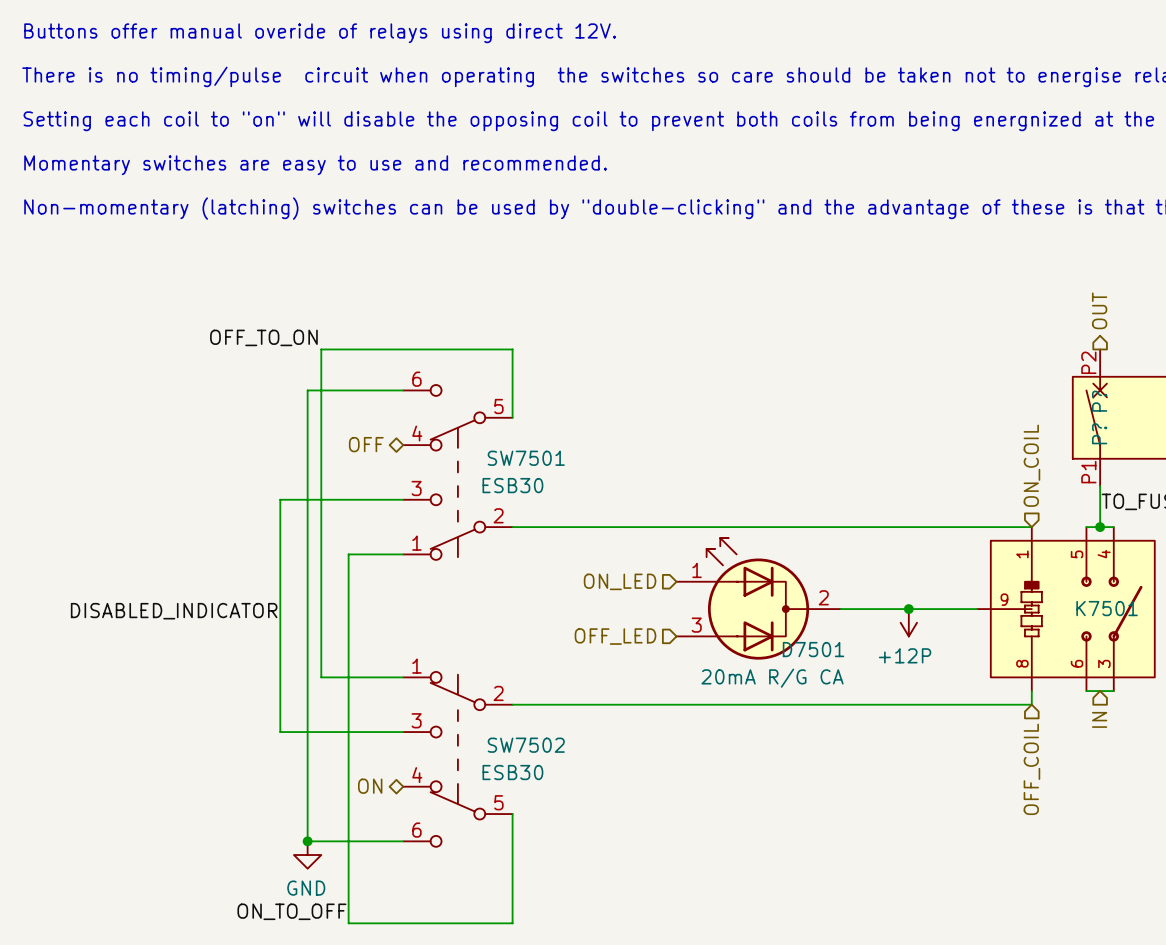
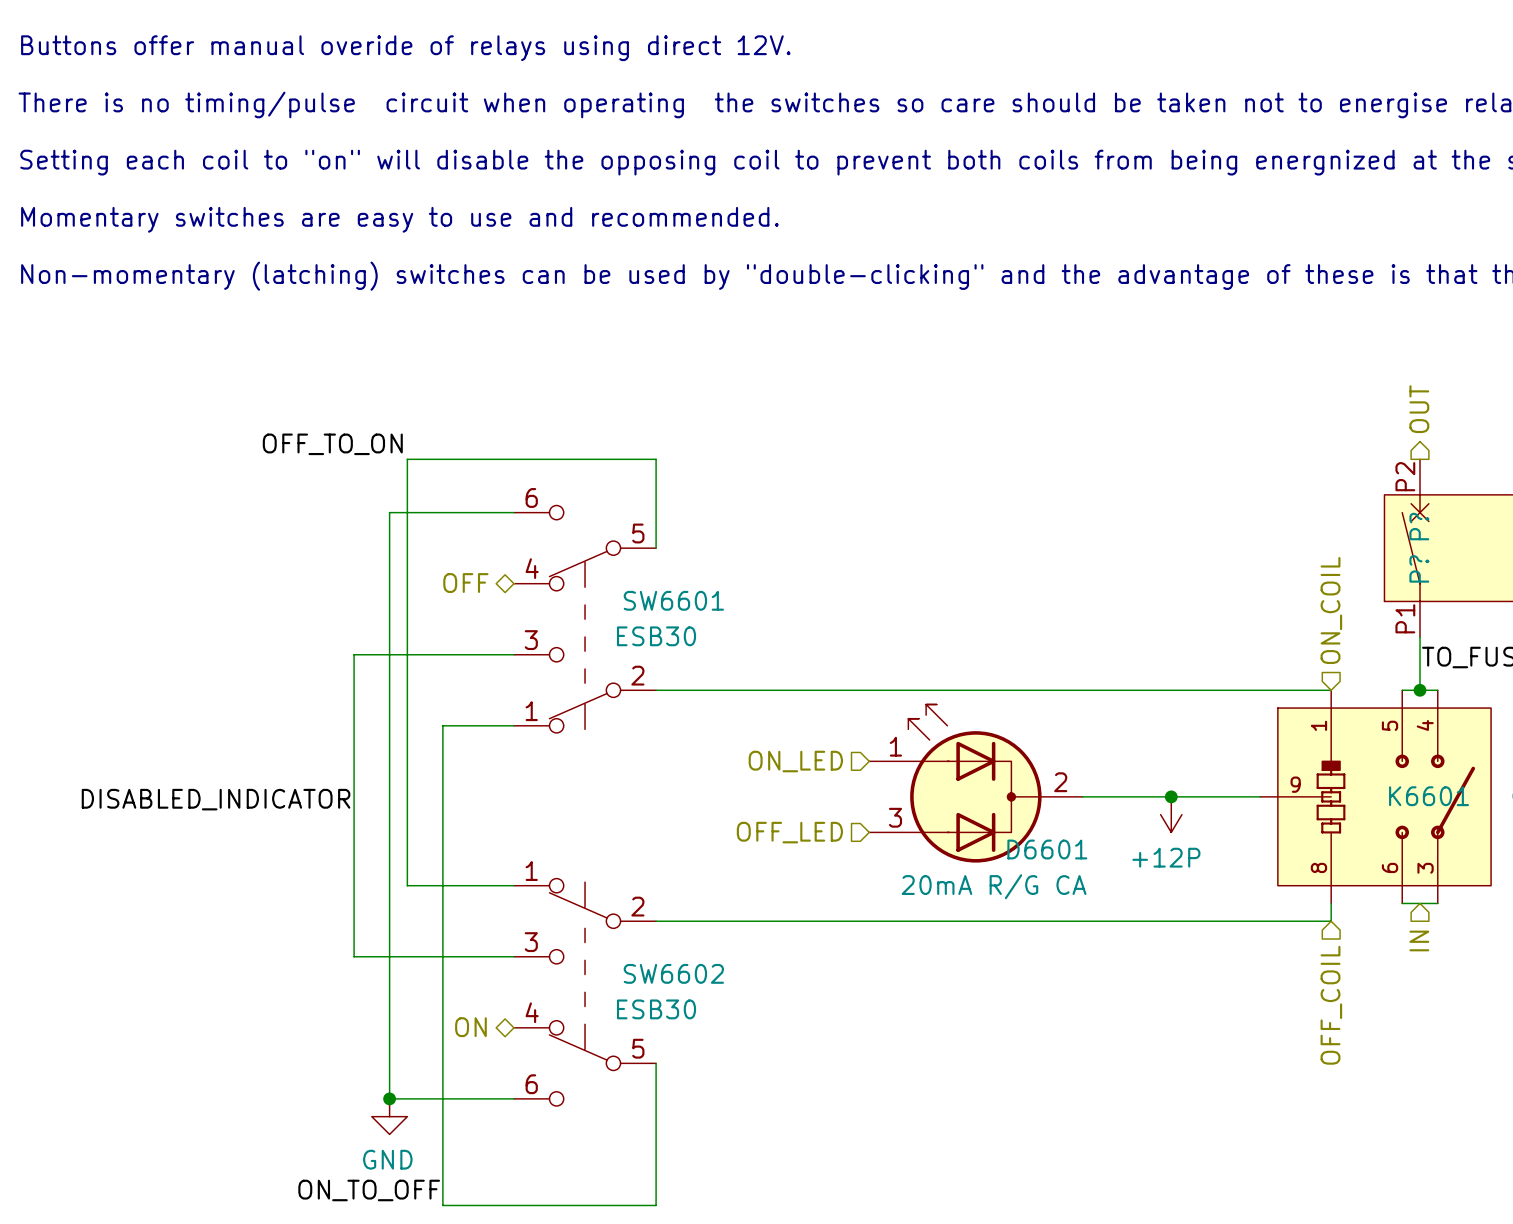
SW7501 name: SW7501 (526, 458) -> SW6601 (673, 600)
K7501 name: K7501 (1107, 608) -> K6601 (1429, 796)
D7501 name: D7501 (813, 649) -> D6601 (1047, 849)
SW7502 name: SW7502 (526, 745) -> SW6602 (673, 973)

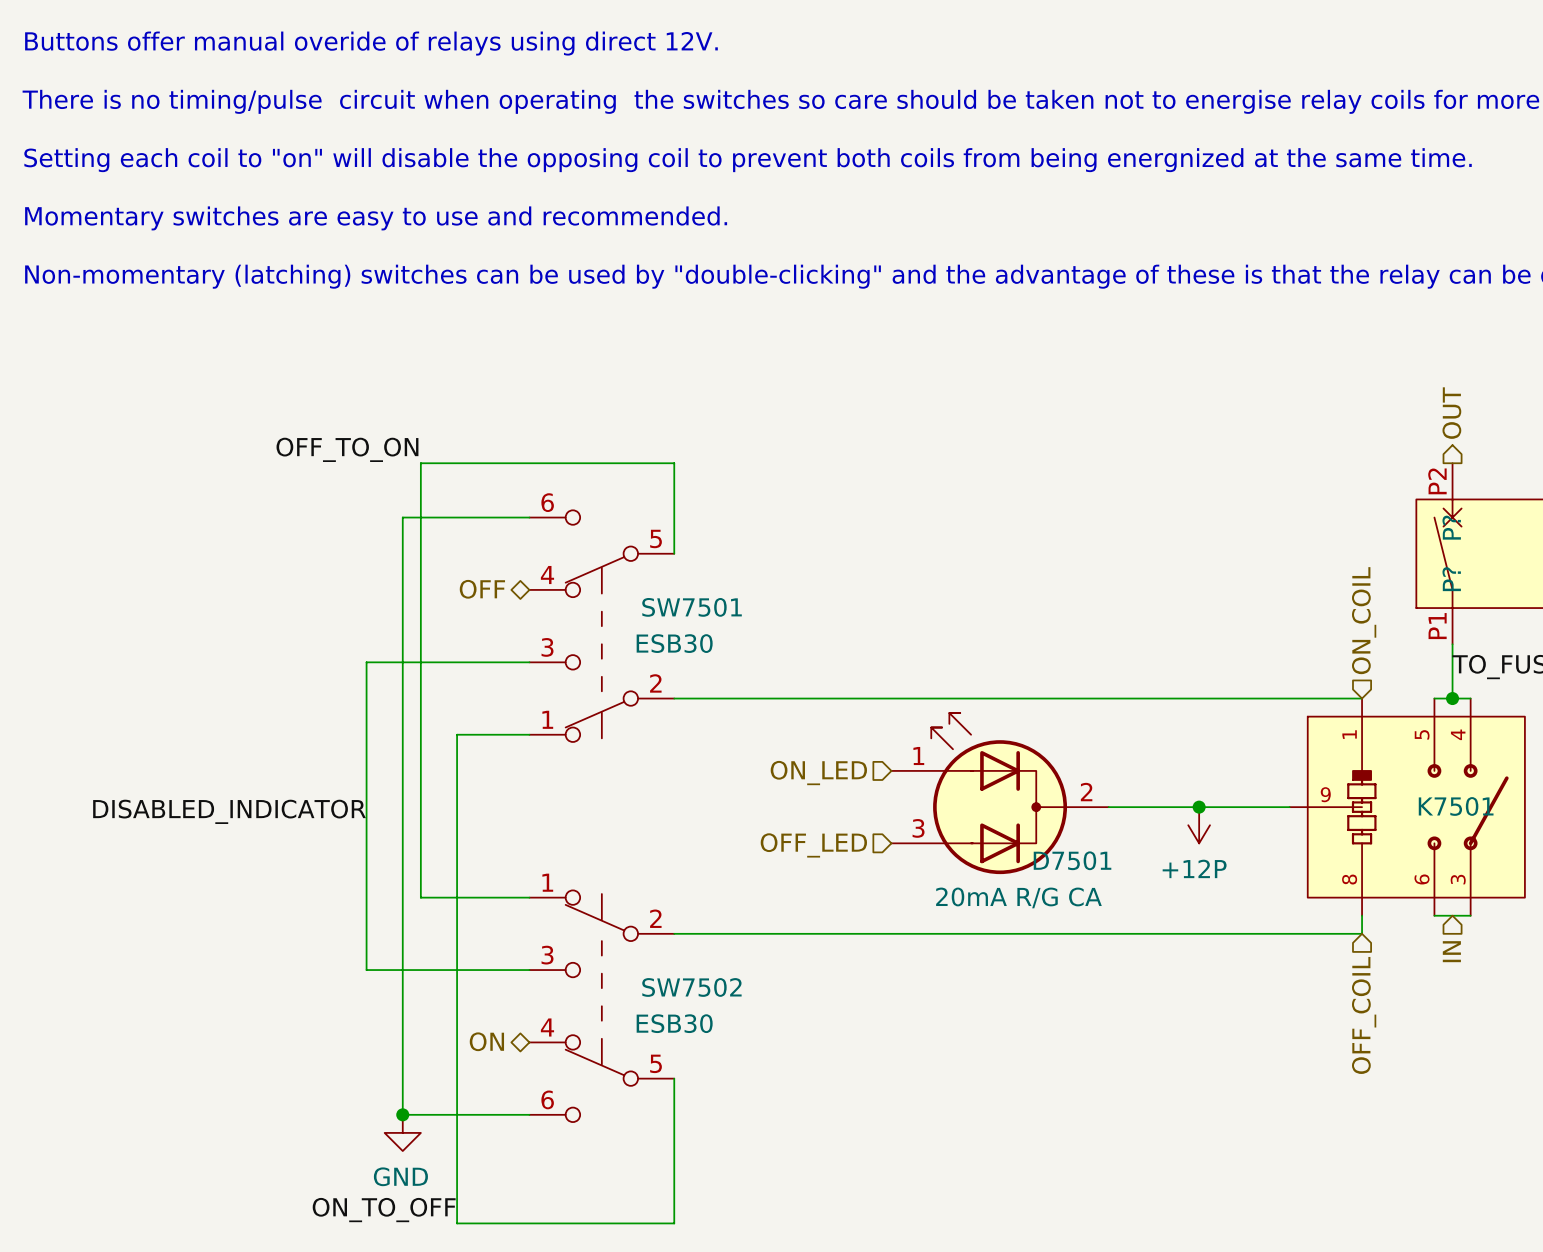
SW6601 name: SW6601 (673, 600) -> SW7501 (692, 607)
K6601 name: K6601 (1429, 796) -> K7501 (1456, 806)
D6601 name: D6601 (1047, 849) -> D7501 (1072, 860)
SW6602 name: SW6602 (673, 973) -> SW7502 (691, 987)

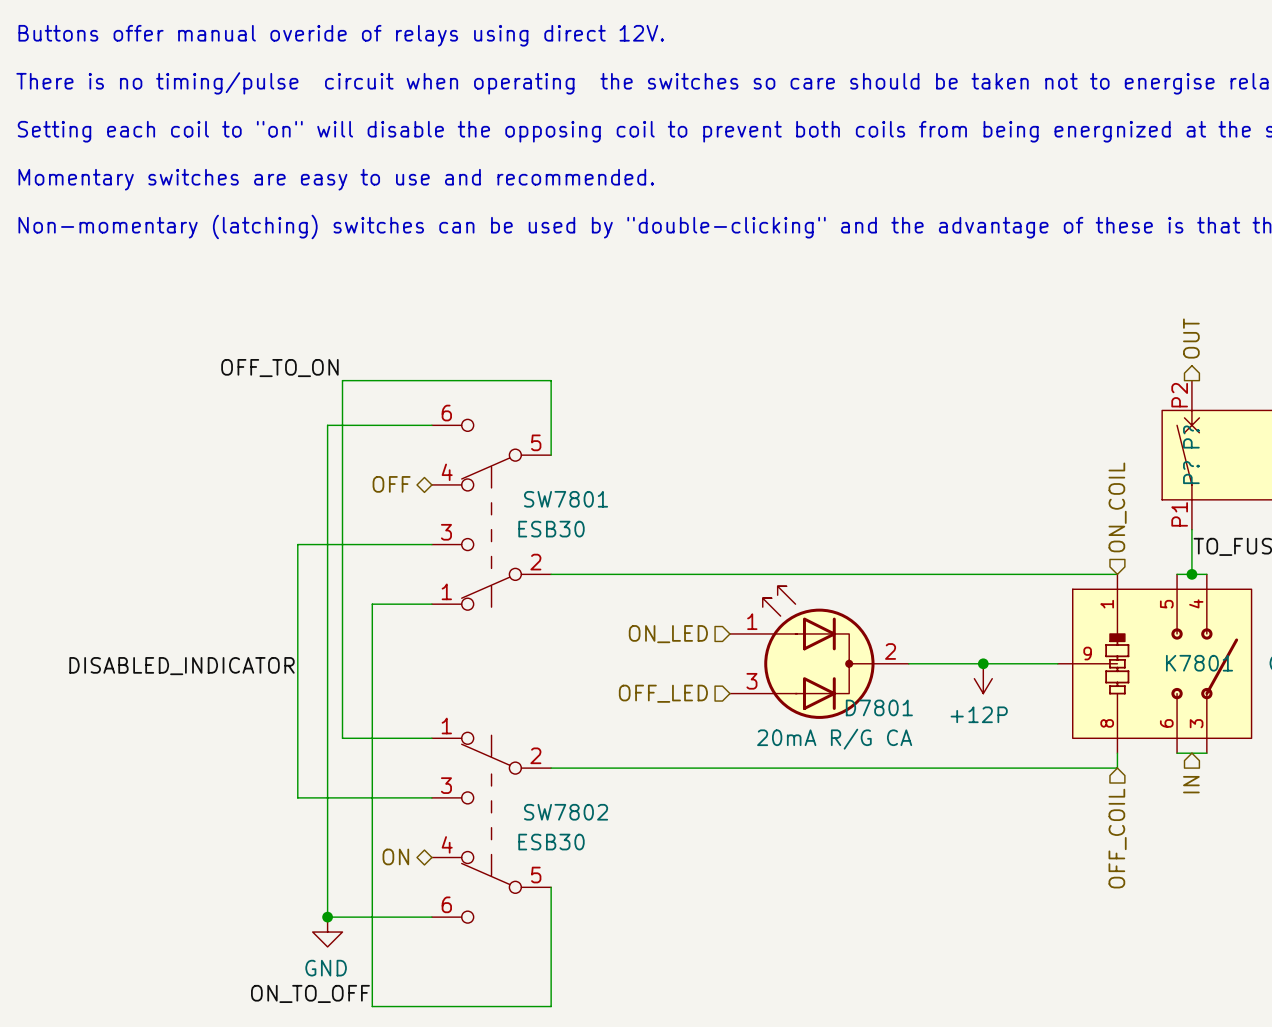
SW7501 name: SW7501 (692, 607) -> SW7801 (566, 499)
K7501 name: K7501 (1456, 806) -> K7801 (1199, 663)
D7501 name: D7501 (1072, 860) -> D7801 (879, 707)
SW7502 name: SW7502 (691, 987) -> SW7802 (566, 812)

